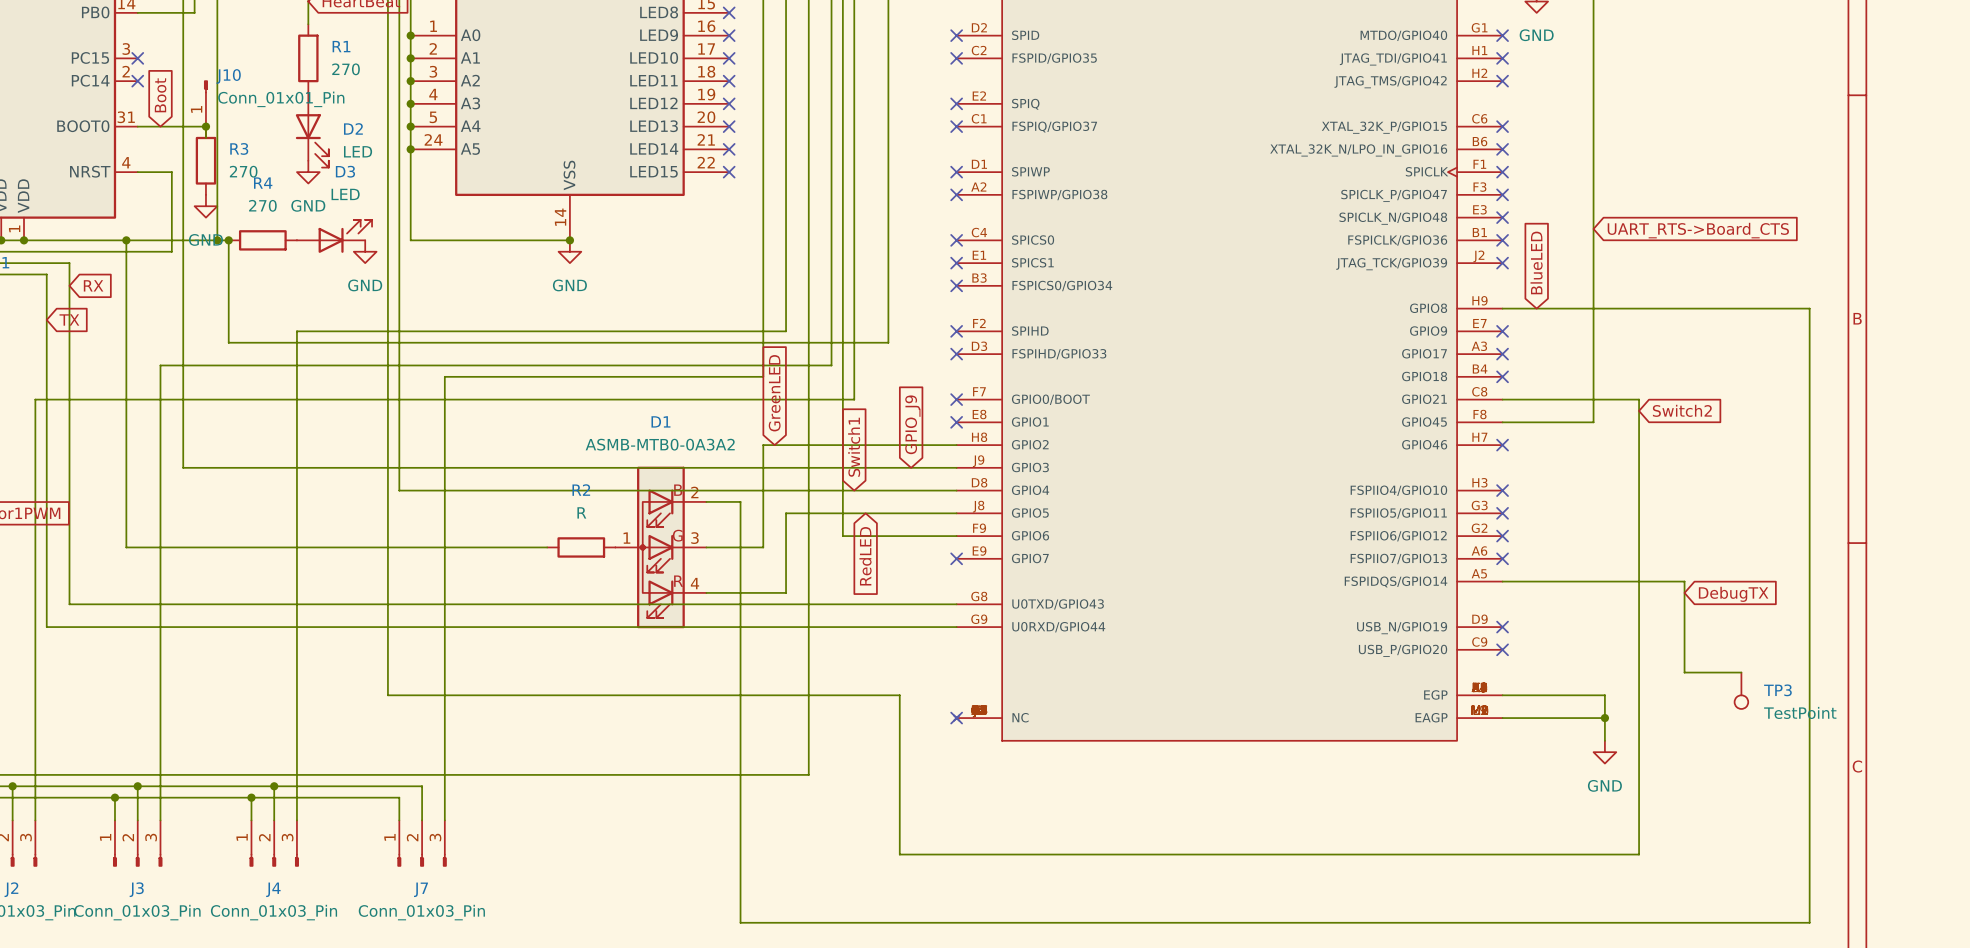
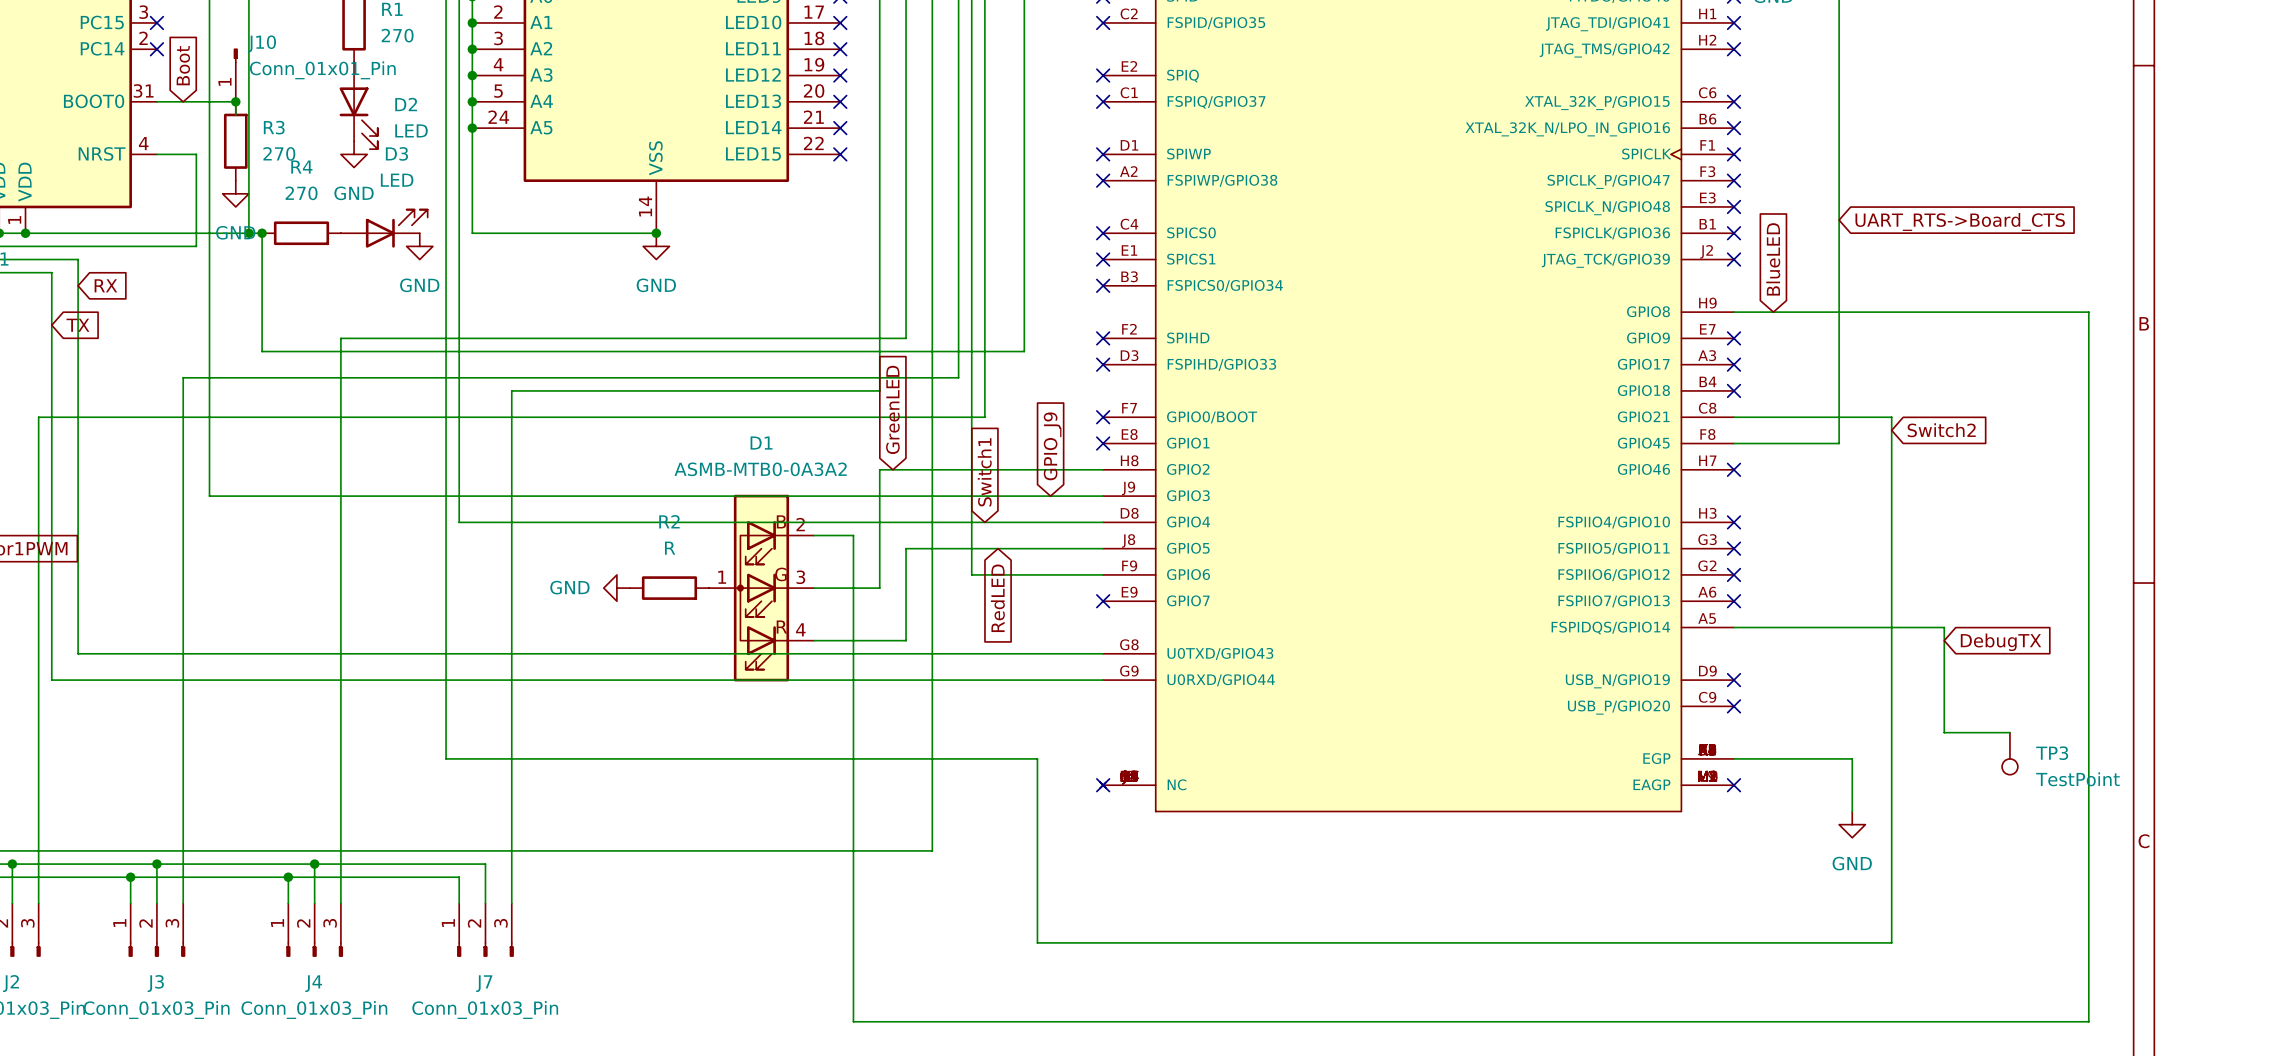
wire: (126, 240) (126, 547) (547, 547) -> none
junction: (126, 240) -> none
power symbol: none -> GND (616, 588)
wire: (1502, 718) (1604, 718) -> none
no-connect mark: none -> (1733, 785)
junction: (1604, 718) -> none

